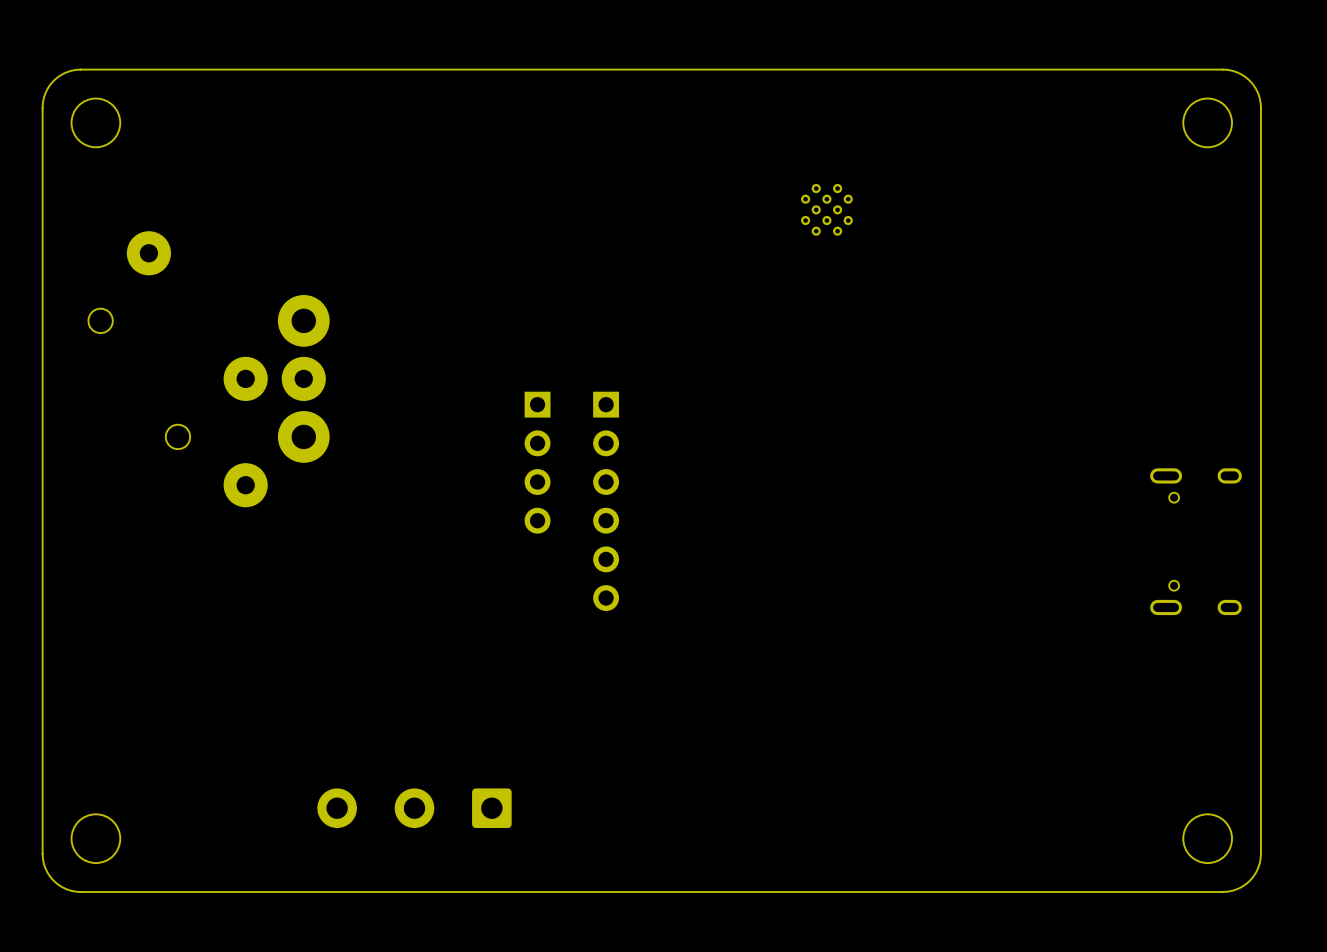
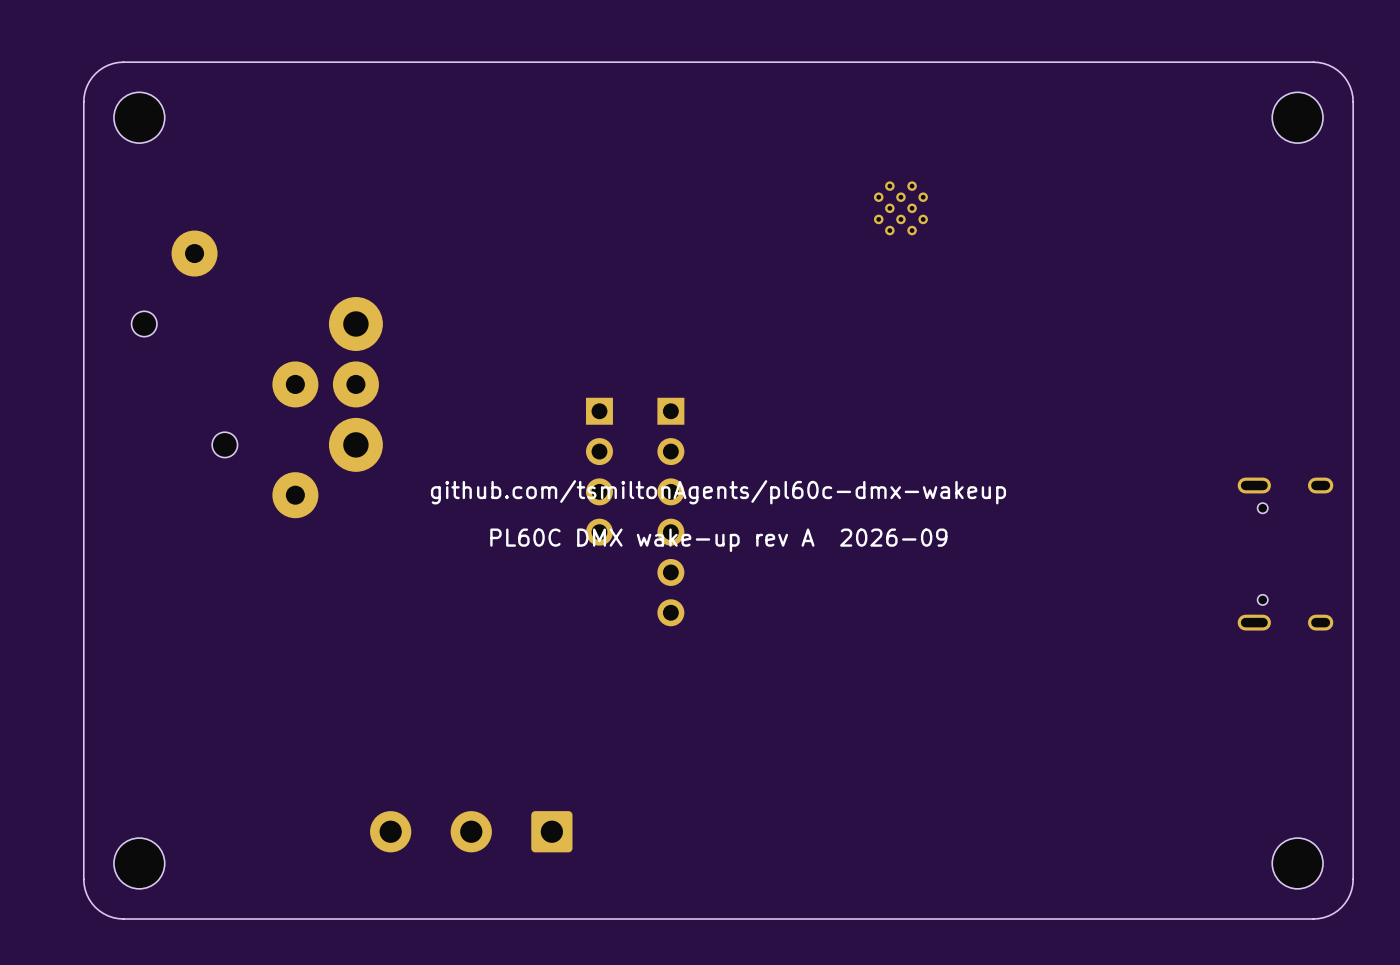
text: none -> github.com/tsmiltonAgents/pl60c-dmx-wakeup (718, 492)
text: none -> PL60C DMX wake-up rev A 2026-09 (718, 540)

